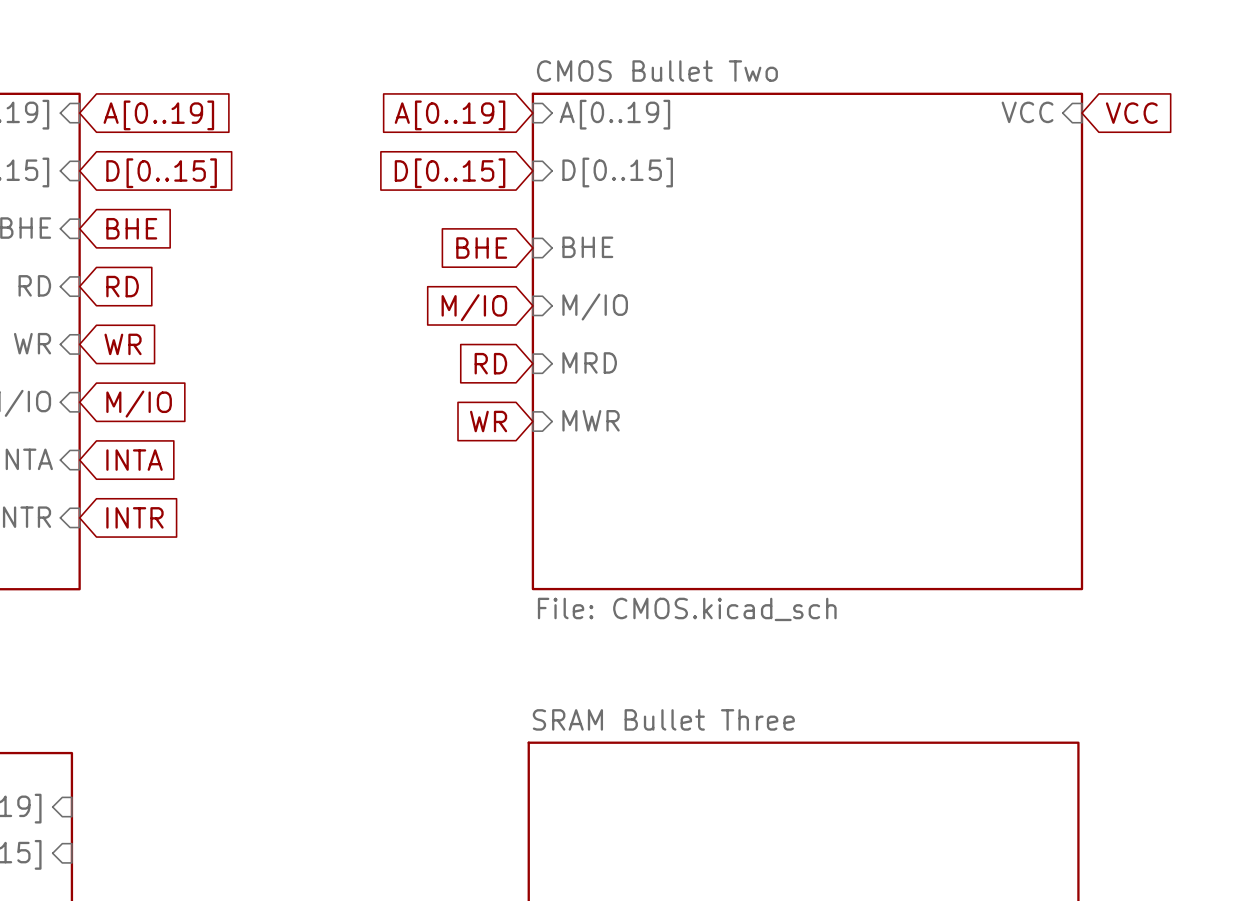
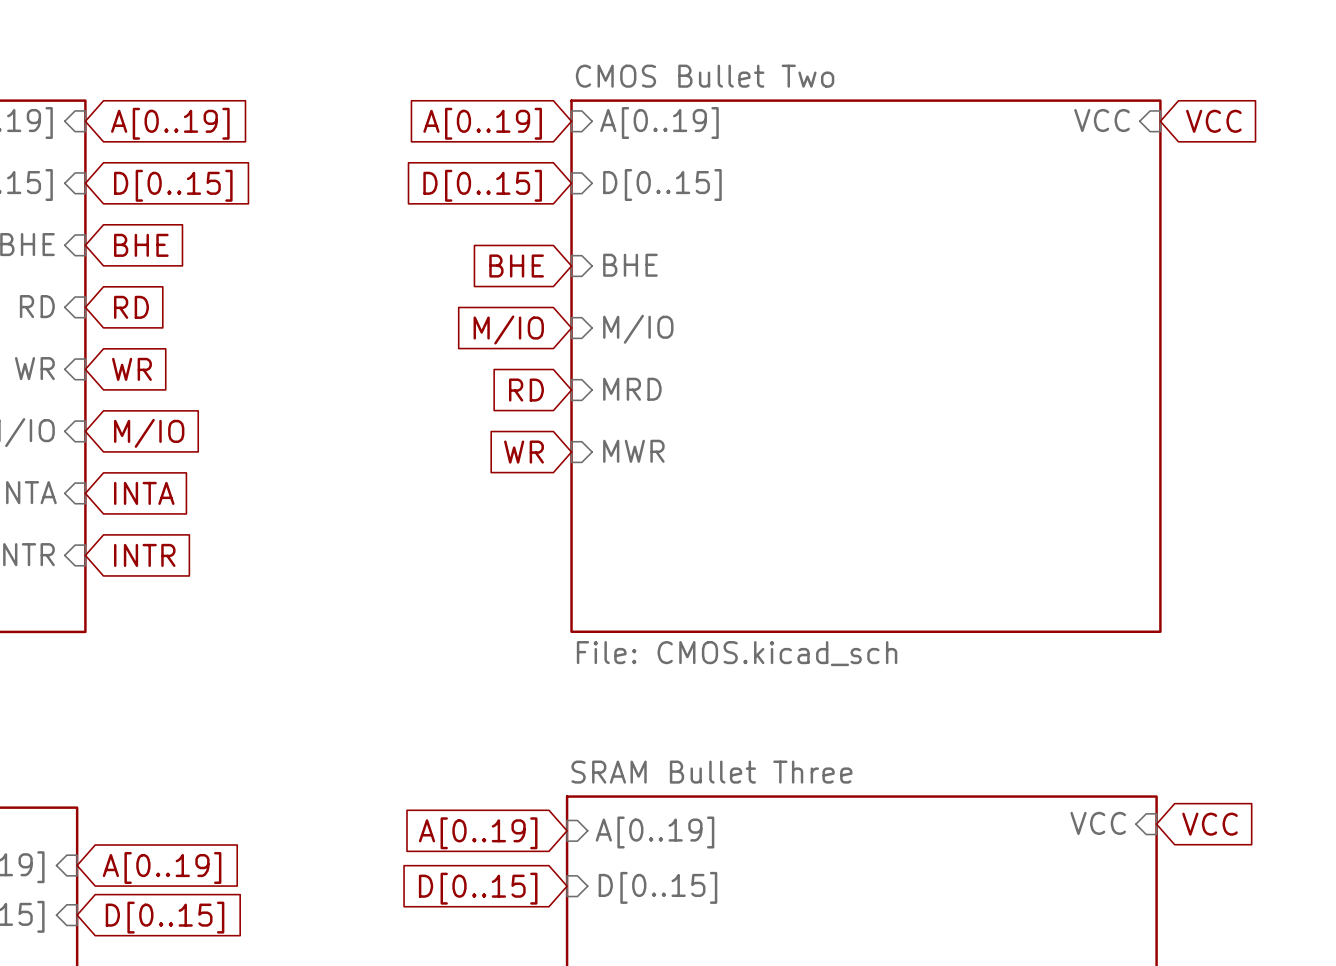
sheet pin: none -> VCC (1098, 823)
global label: none -> VCC (1210, 824)
global label: none -> A[0..19] (478, 833)
sheet pin: none -> A[0..19] (655, 832)
global label: none -> A[0..19] (162, 867)
sheet pin: none -> D[0..15] (657, 887)
global label: none -> D[0..15] (478, 888)
global label: none -> D[0..15] (165, 917)

